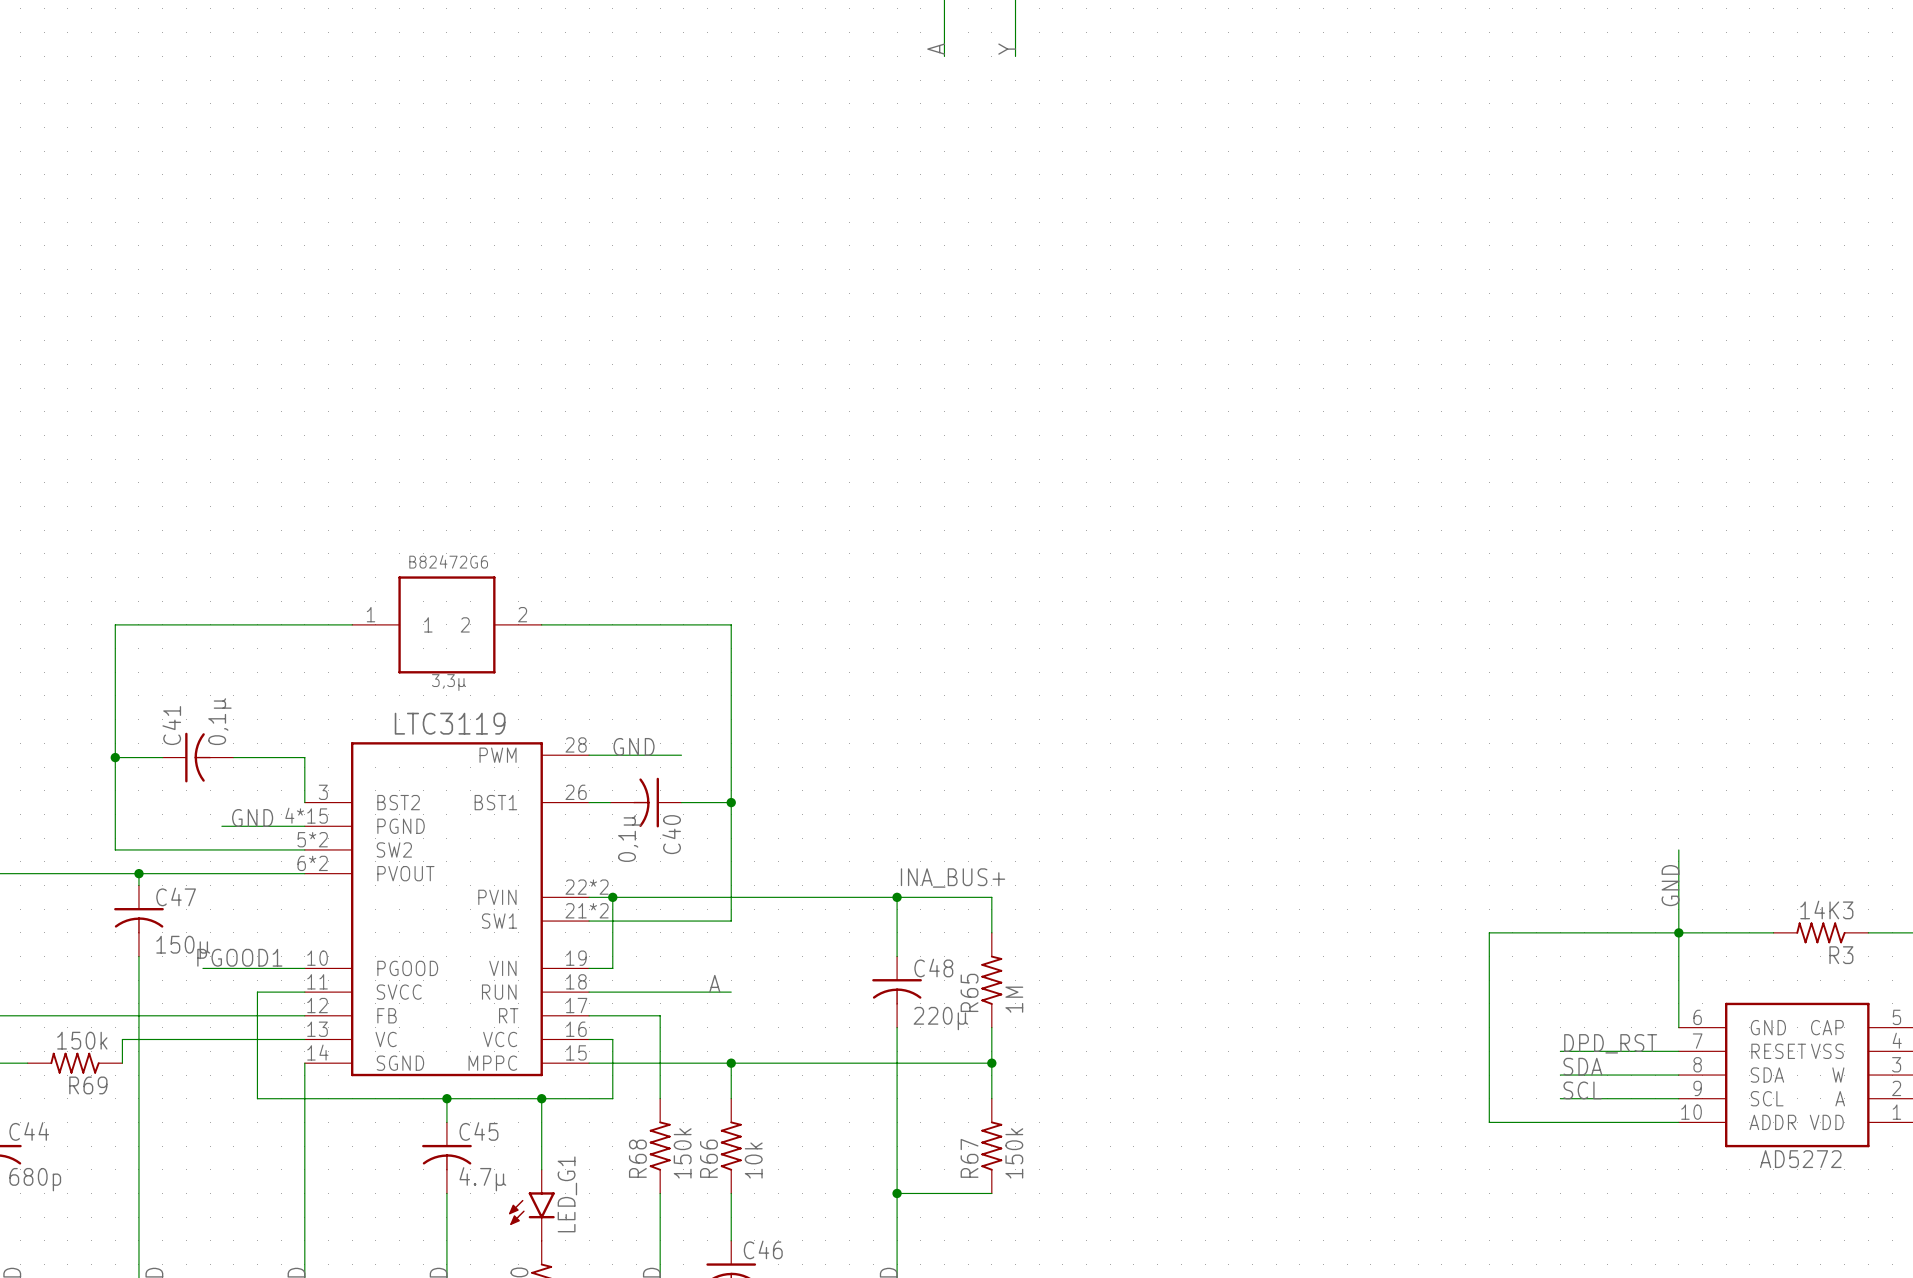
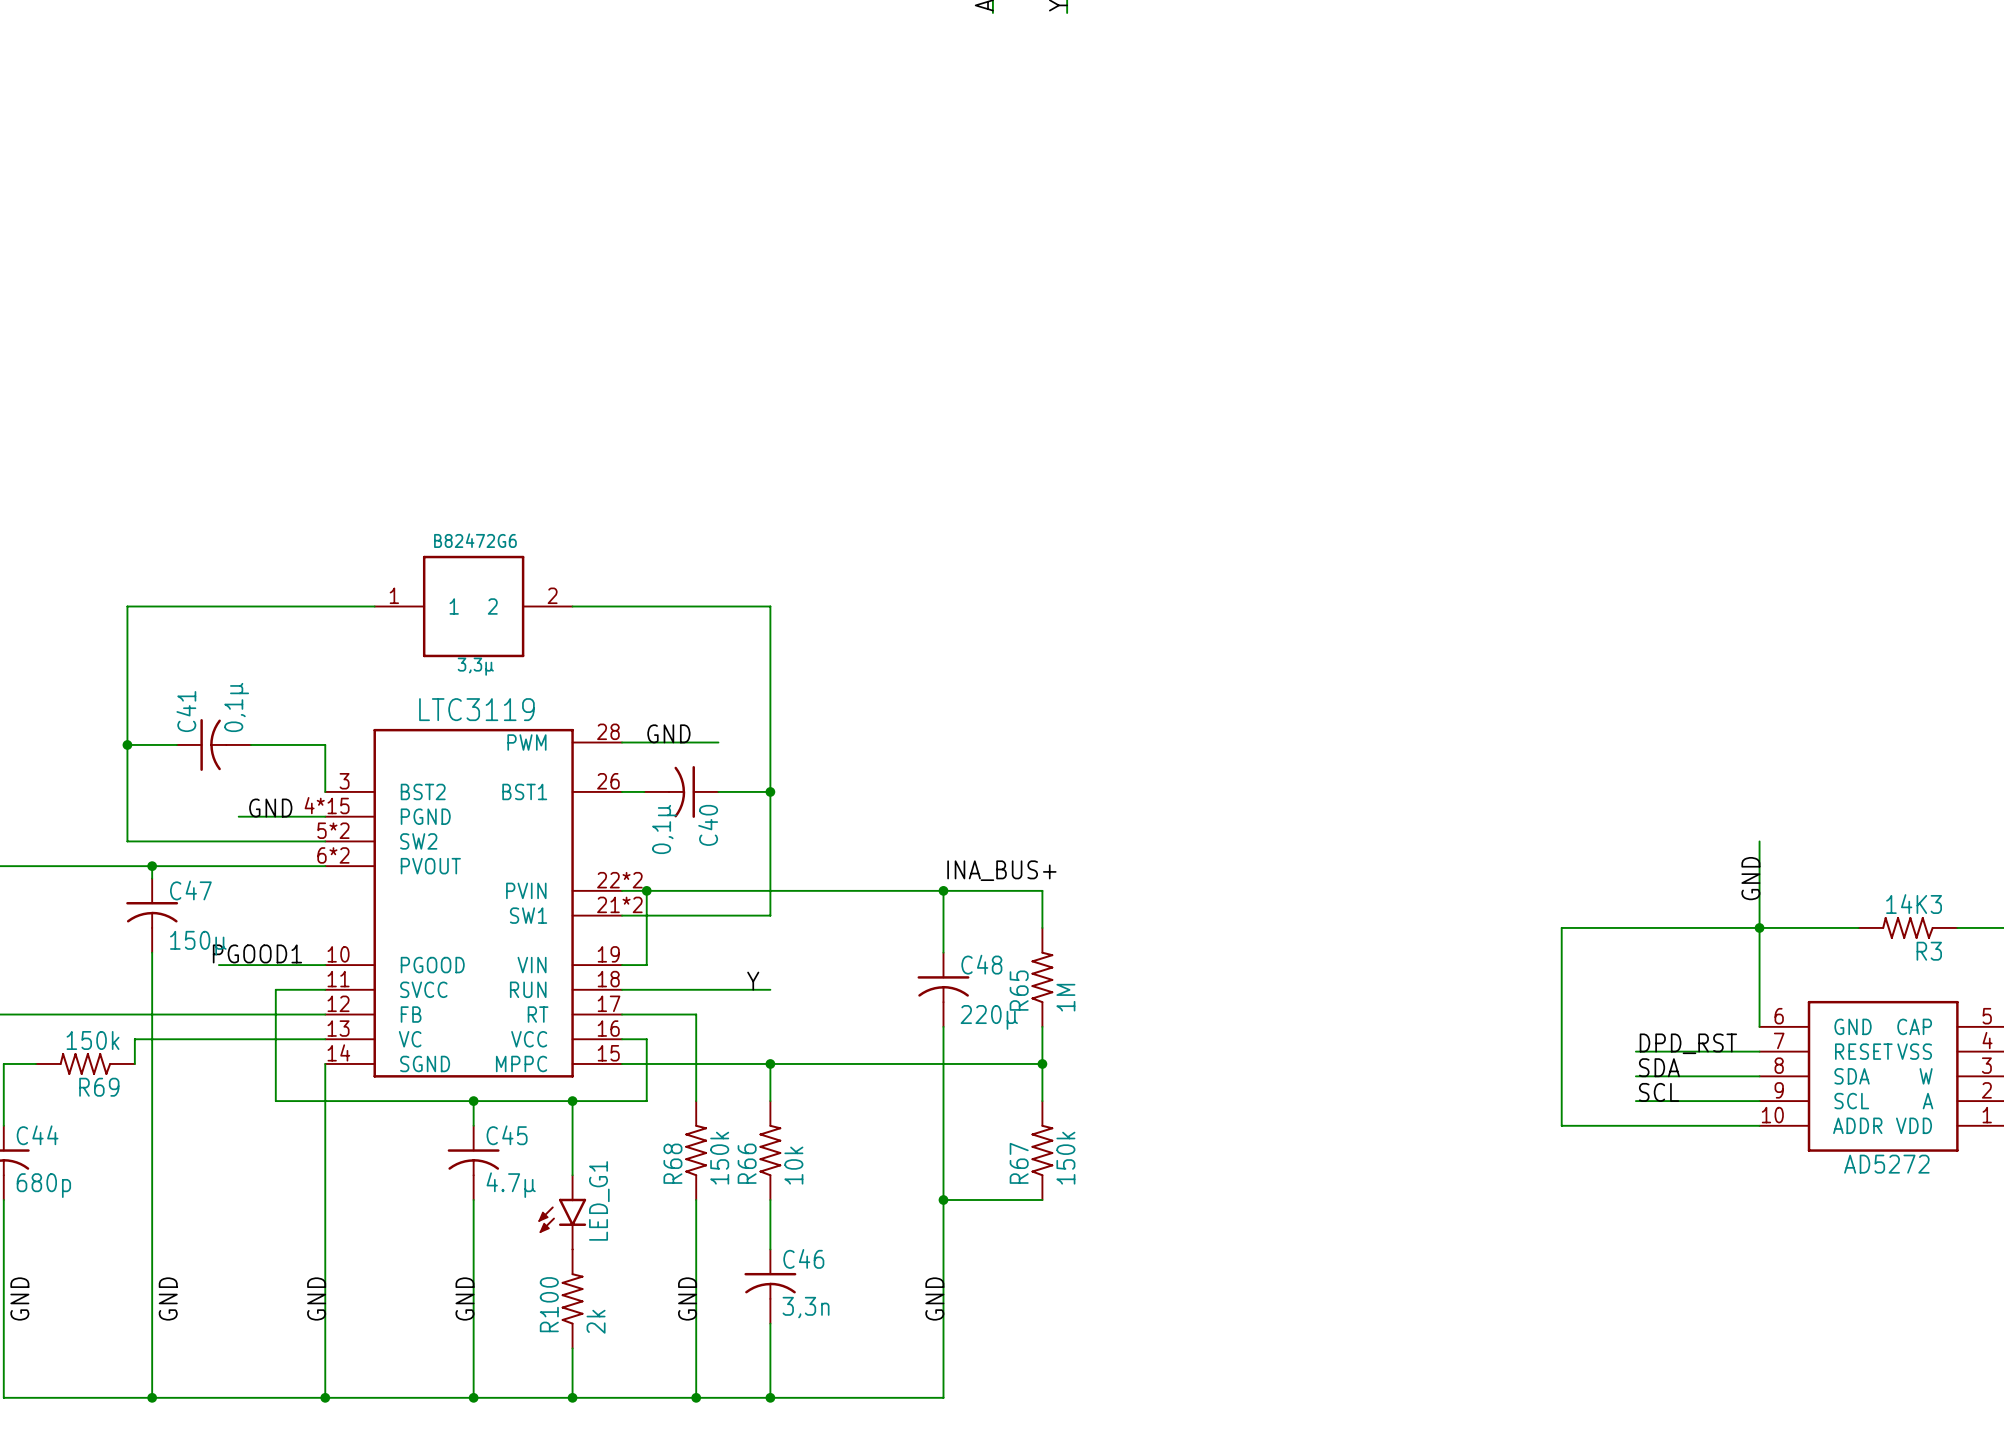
label: A (714, 983) -> Y (753, 981)

